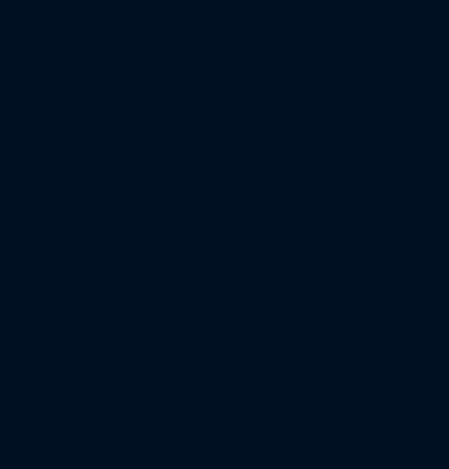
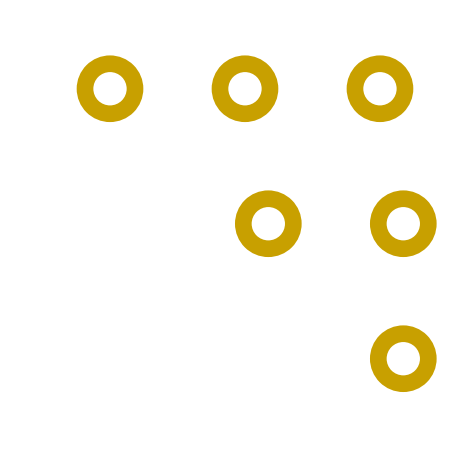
part: none -> (110, 88)
part: none -> (244, 88)
part: none -> (379, 88)
part: none -> (268, 223)
part: none -> (403, 223)
part: none -> (403, 358)

